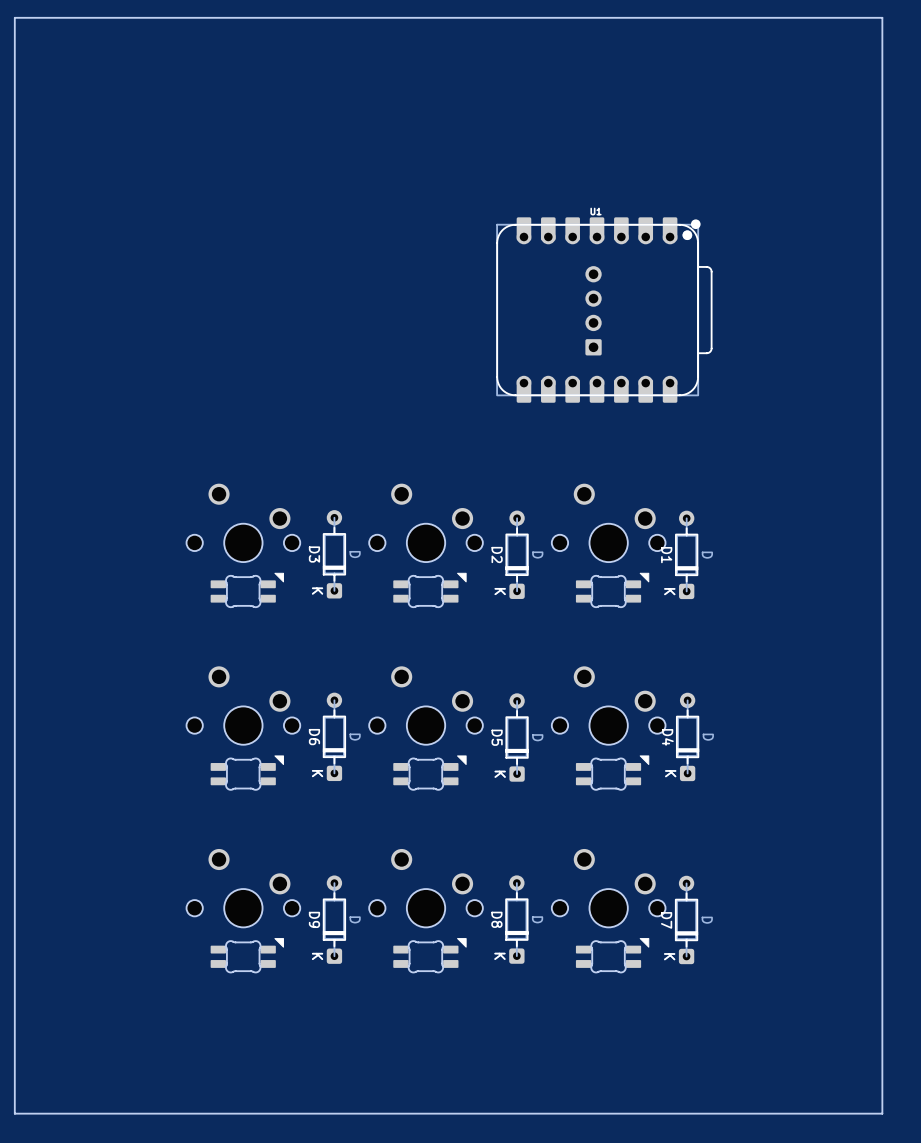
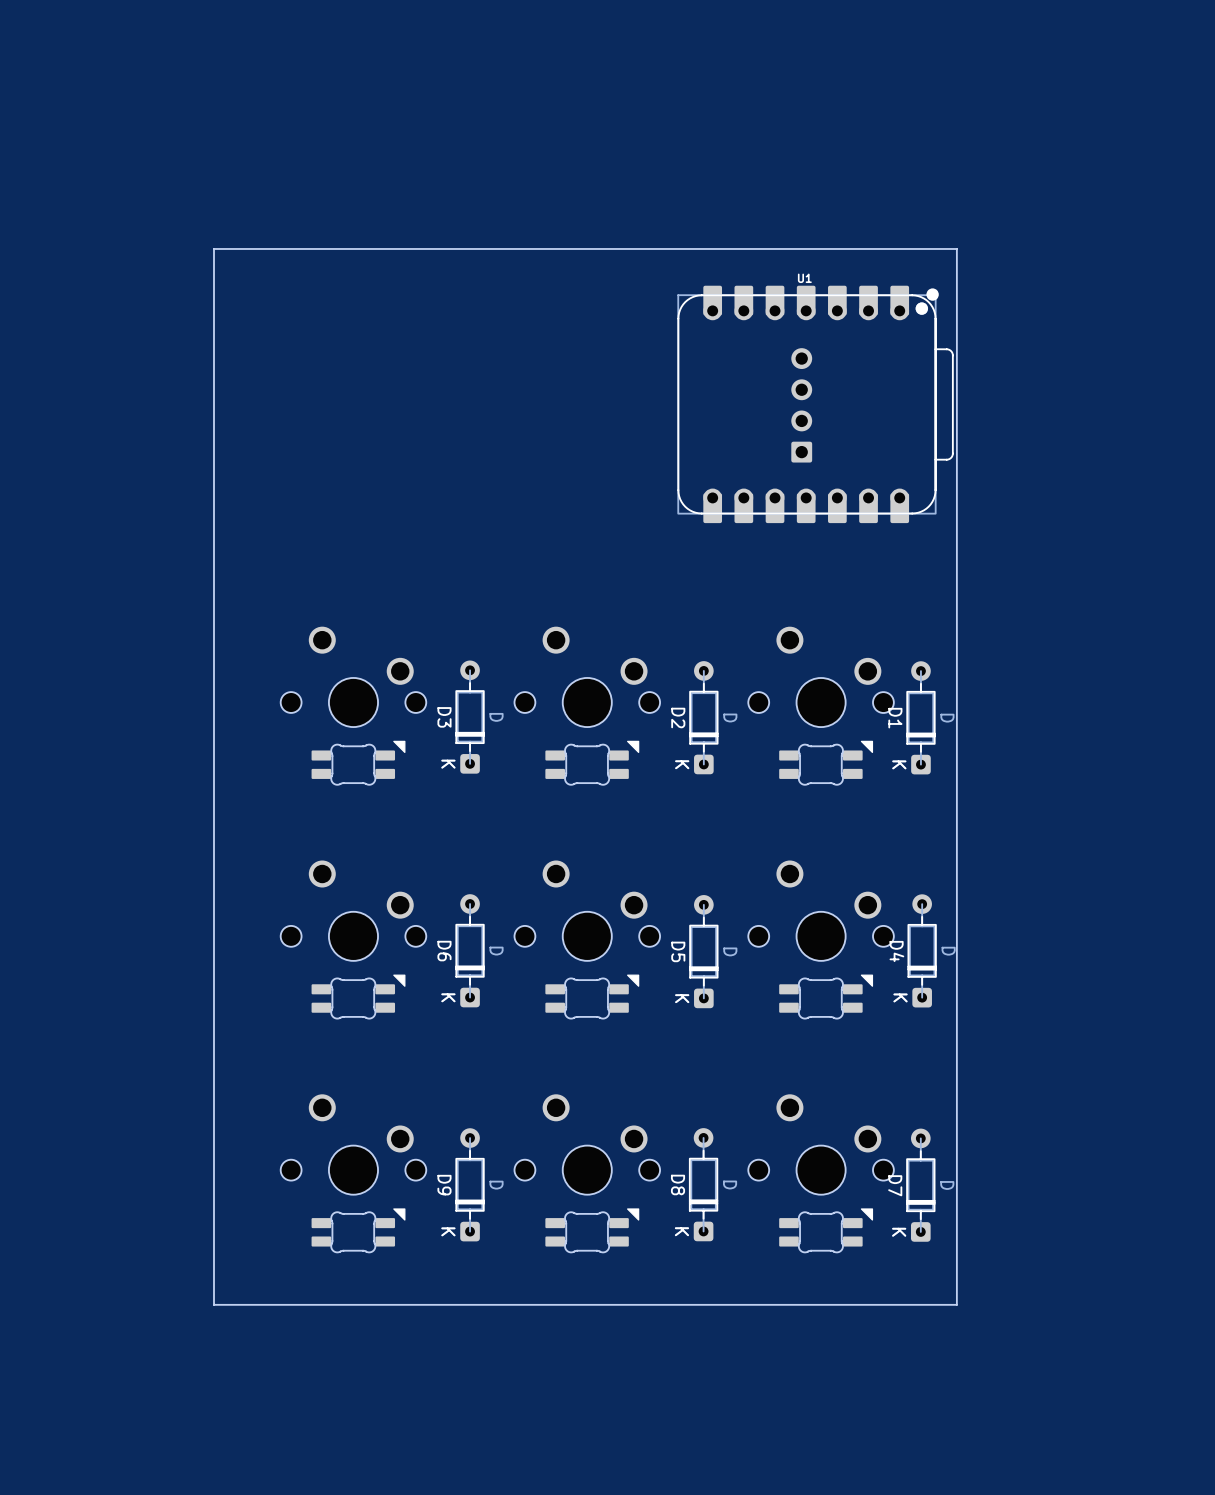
board edge: (882, 17) (14, 17) (14, 1113) (882, 1113) (882, 17) -> (956, 248) (956, 1304) (213, 1304) (213, 248) (956, 248)

